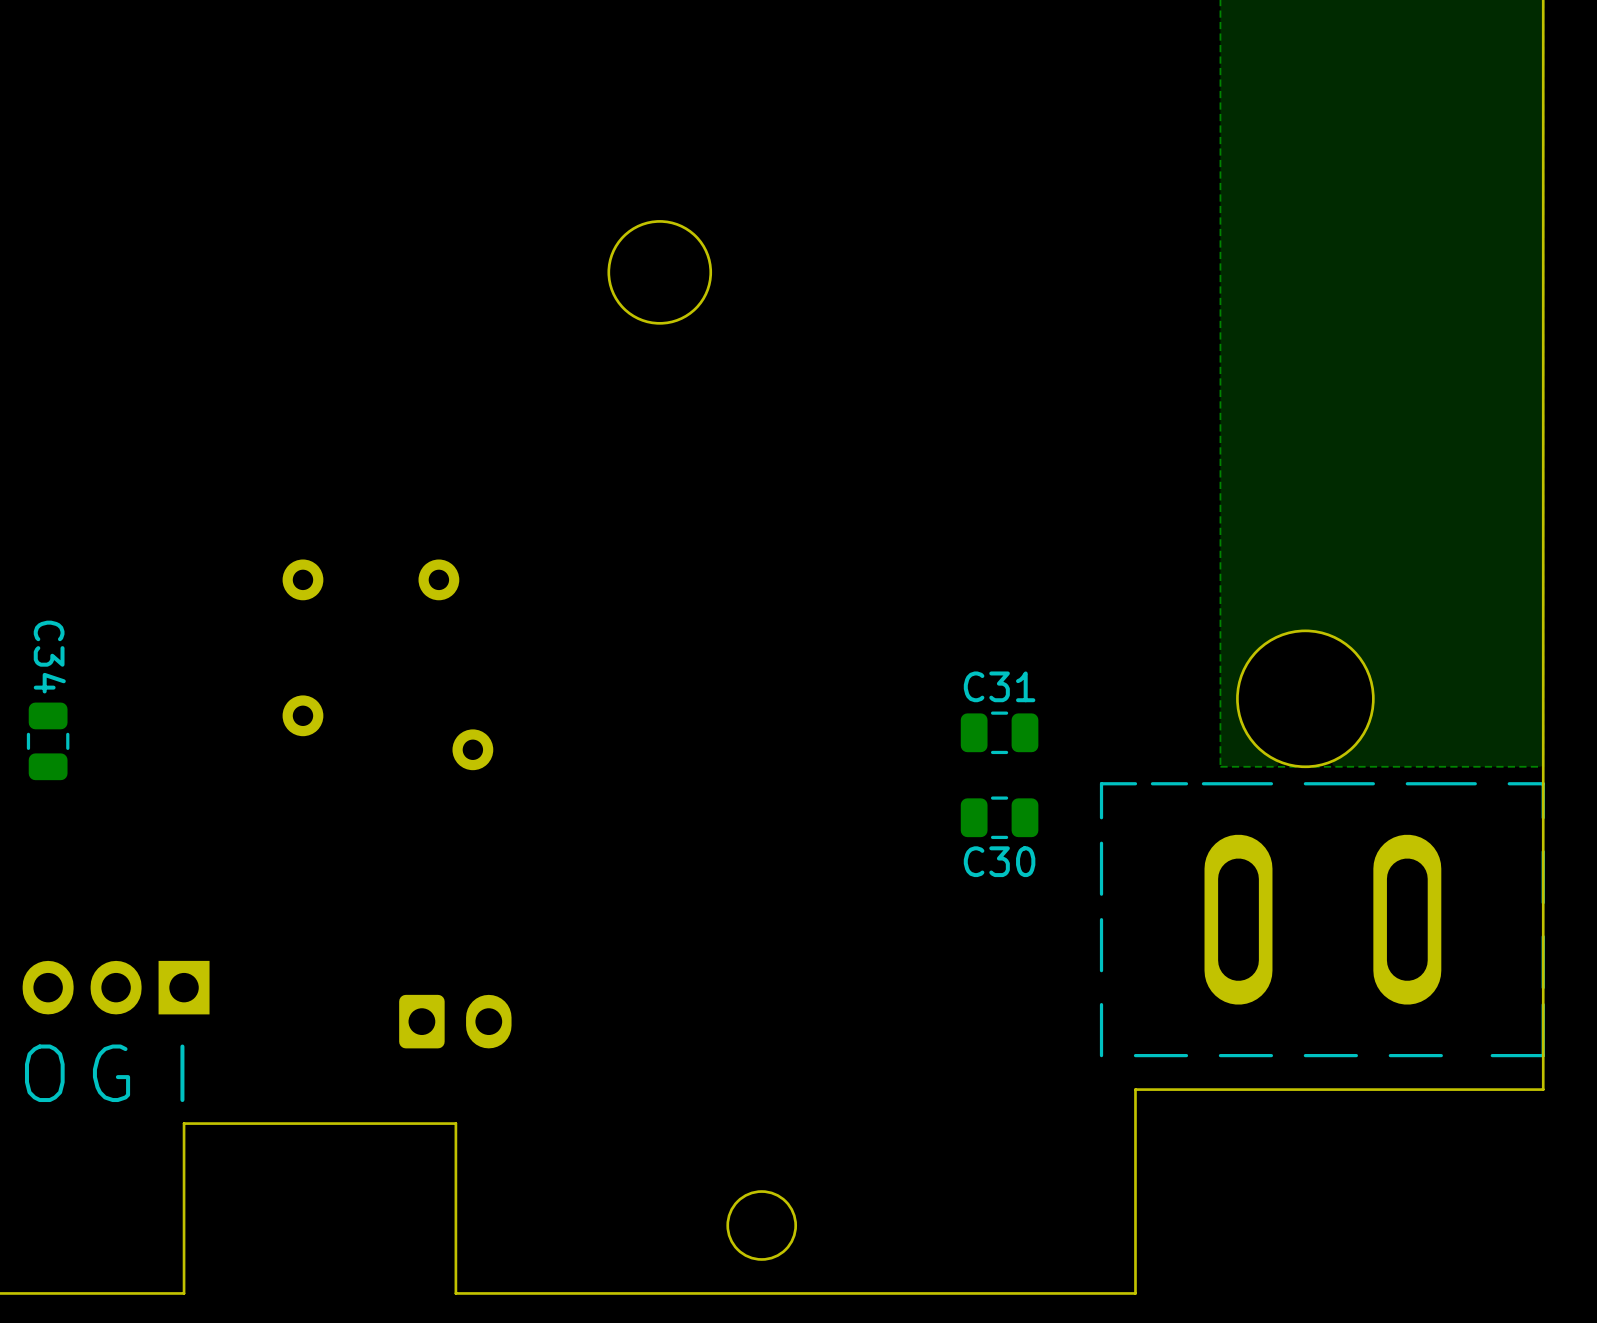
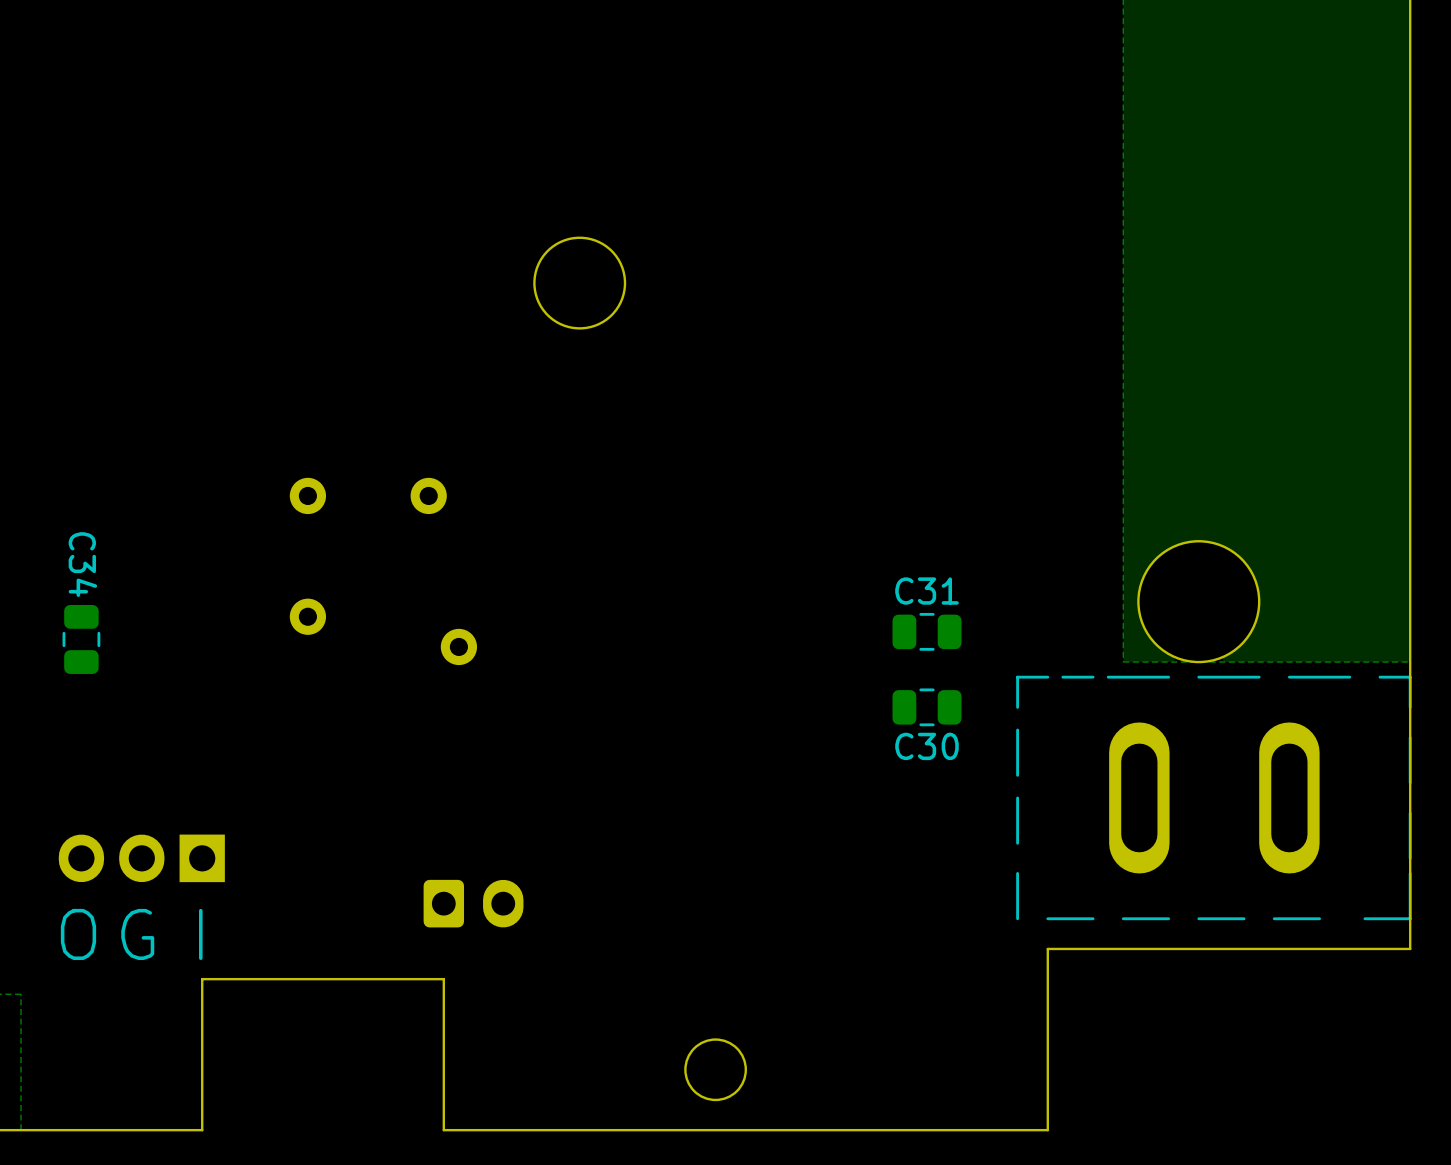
round board edge: [607, 220, 713, 325] -> none
round board edge: none -> [533, 236, 627, 330]
part position: (455, 1021) -> (473, 903)

